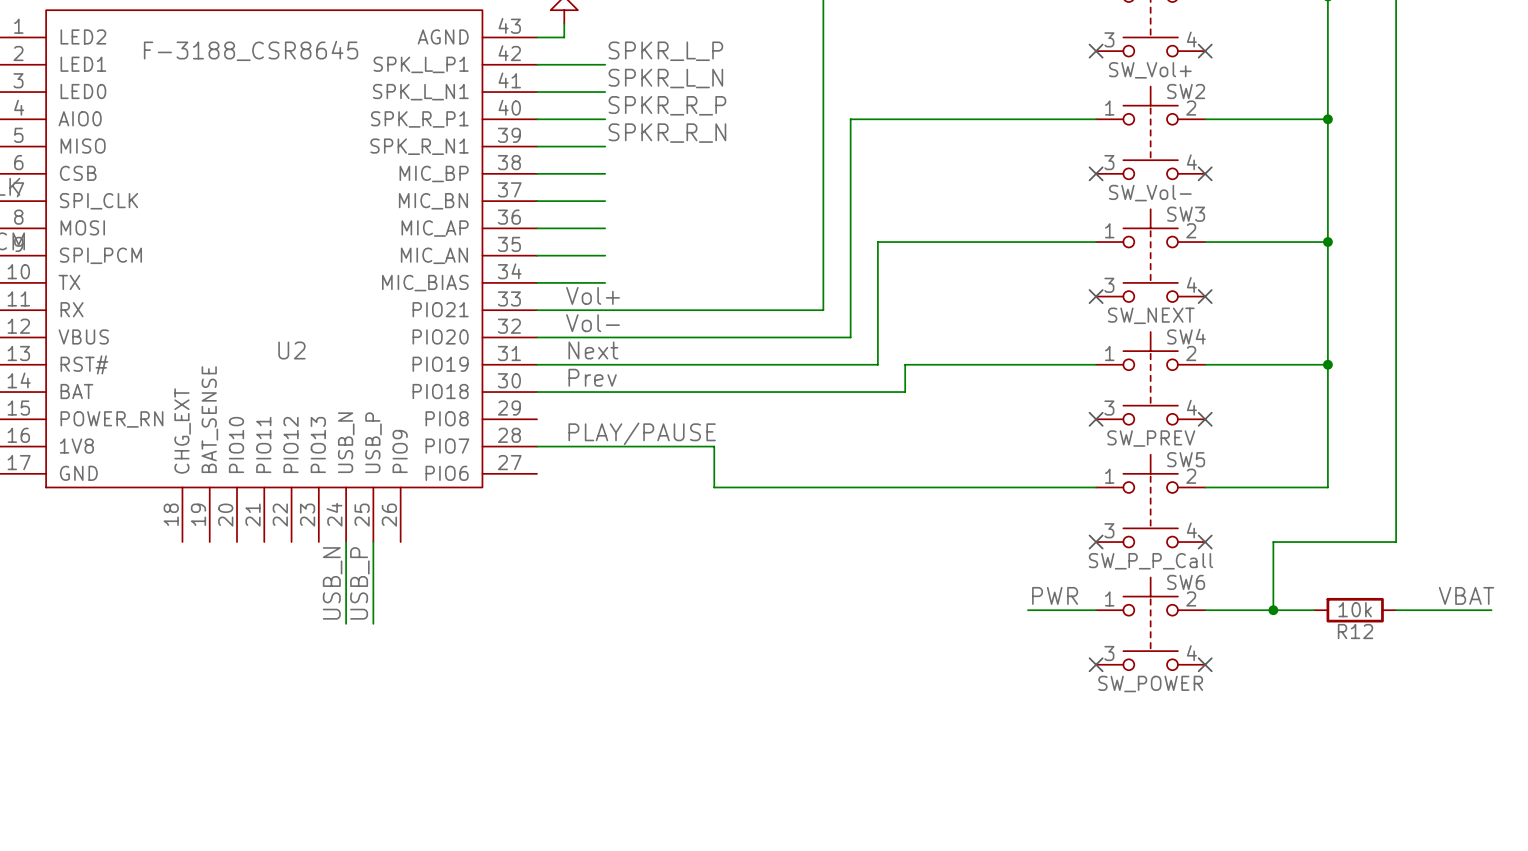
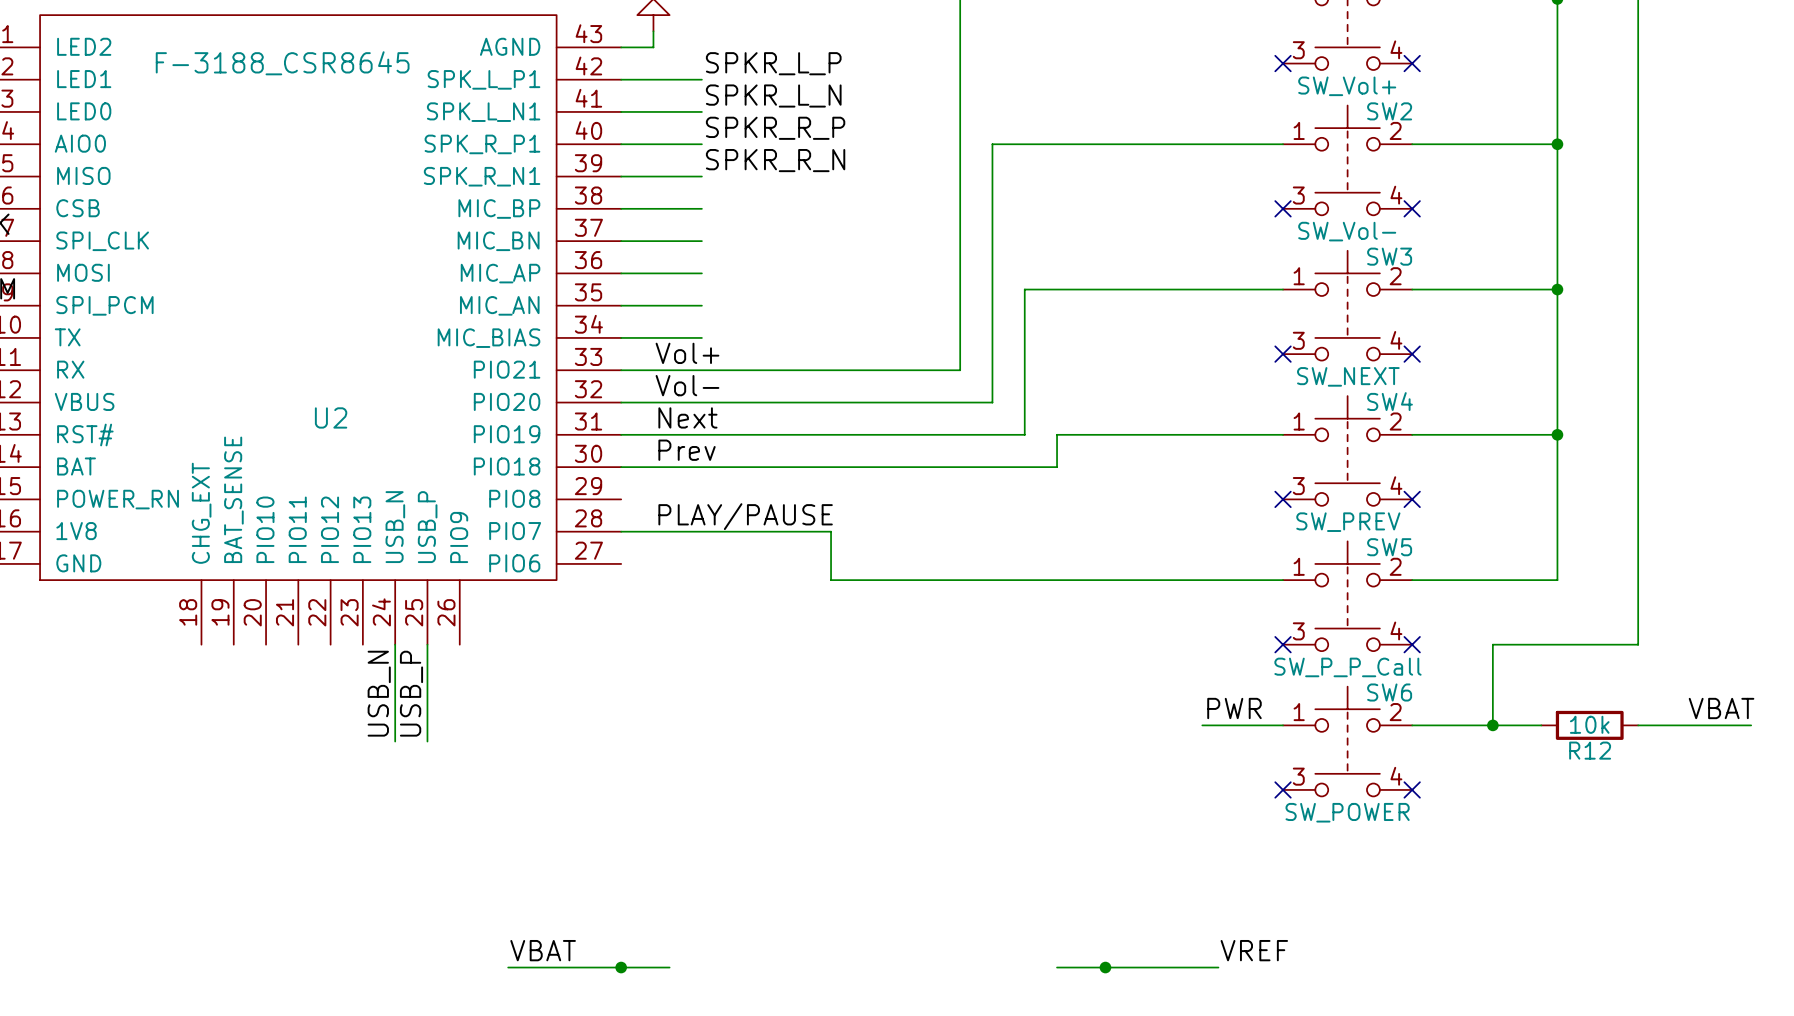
label: none -> VBAT (543, 950)
label: none -> VREF (1254, 950)
wire: none -> (508, 967) (669, 967)
junction: none -> (621, 967)
wire: none -> (1057, 967) (1218, 967)
junction: none -> (1105, 967)

